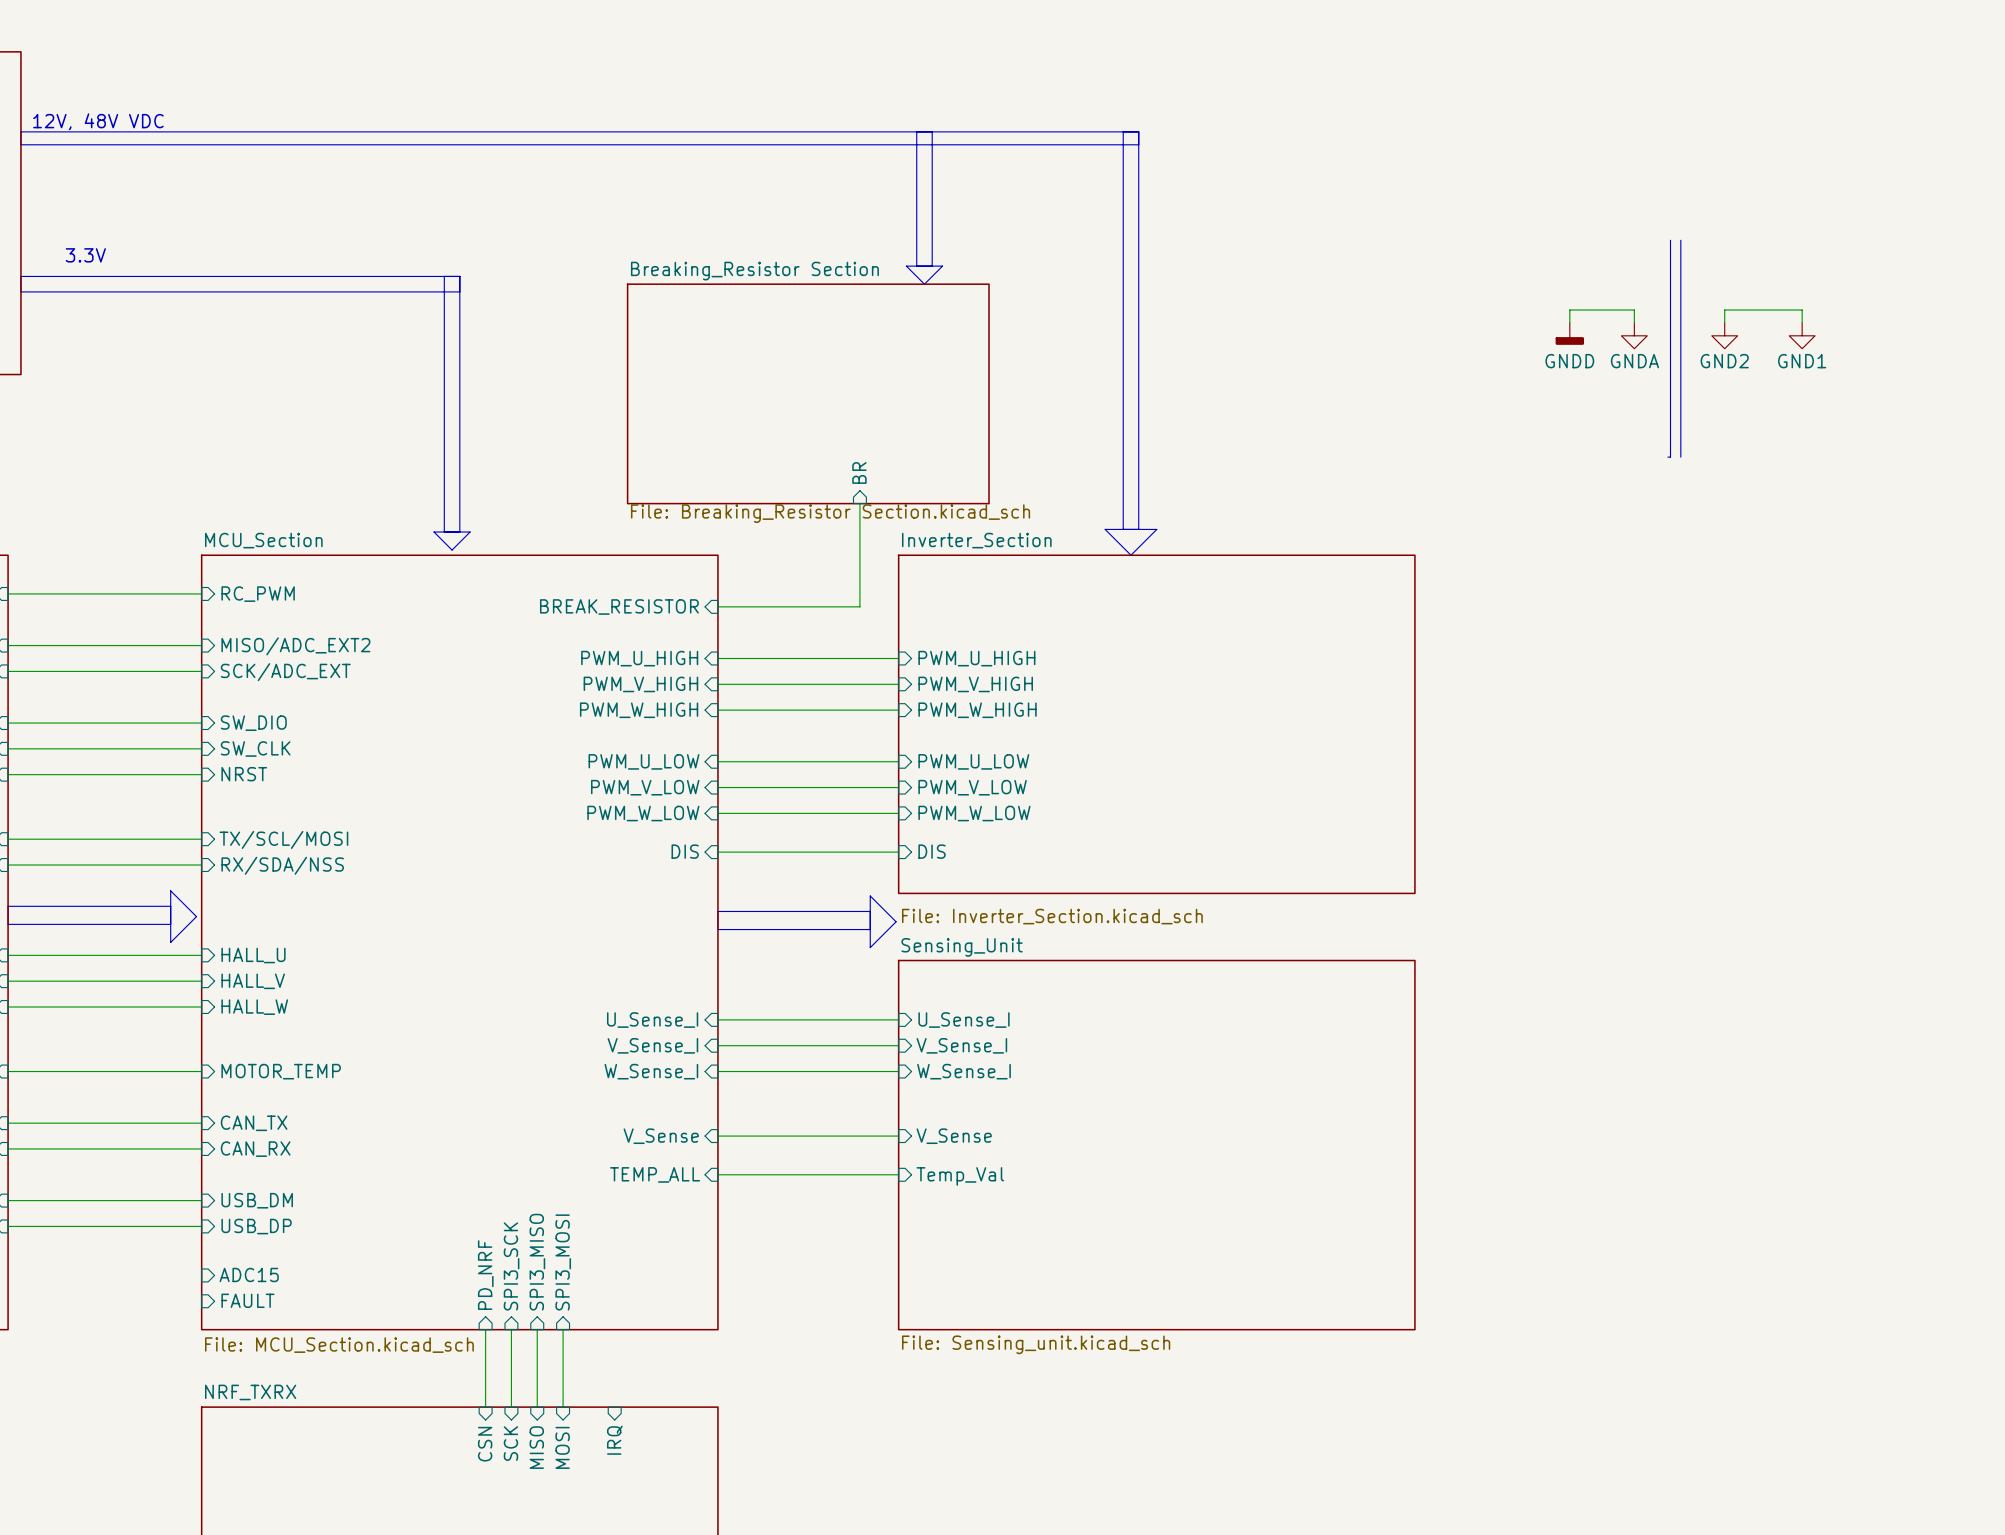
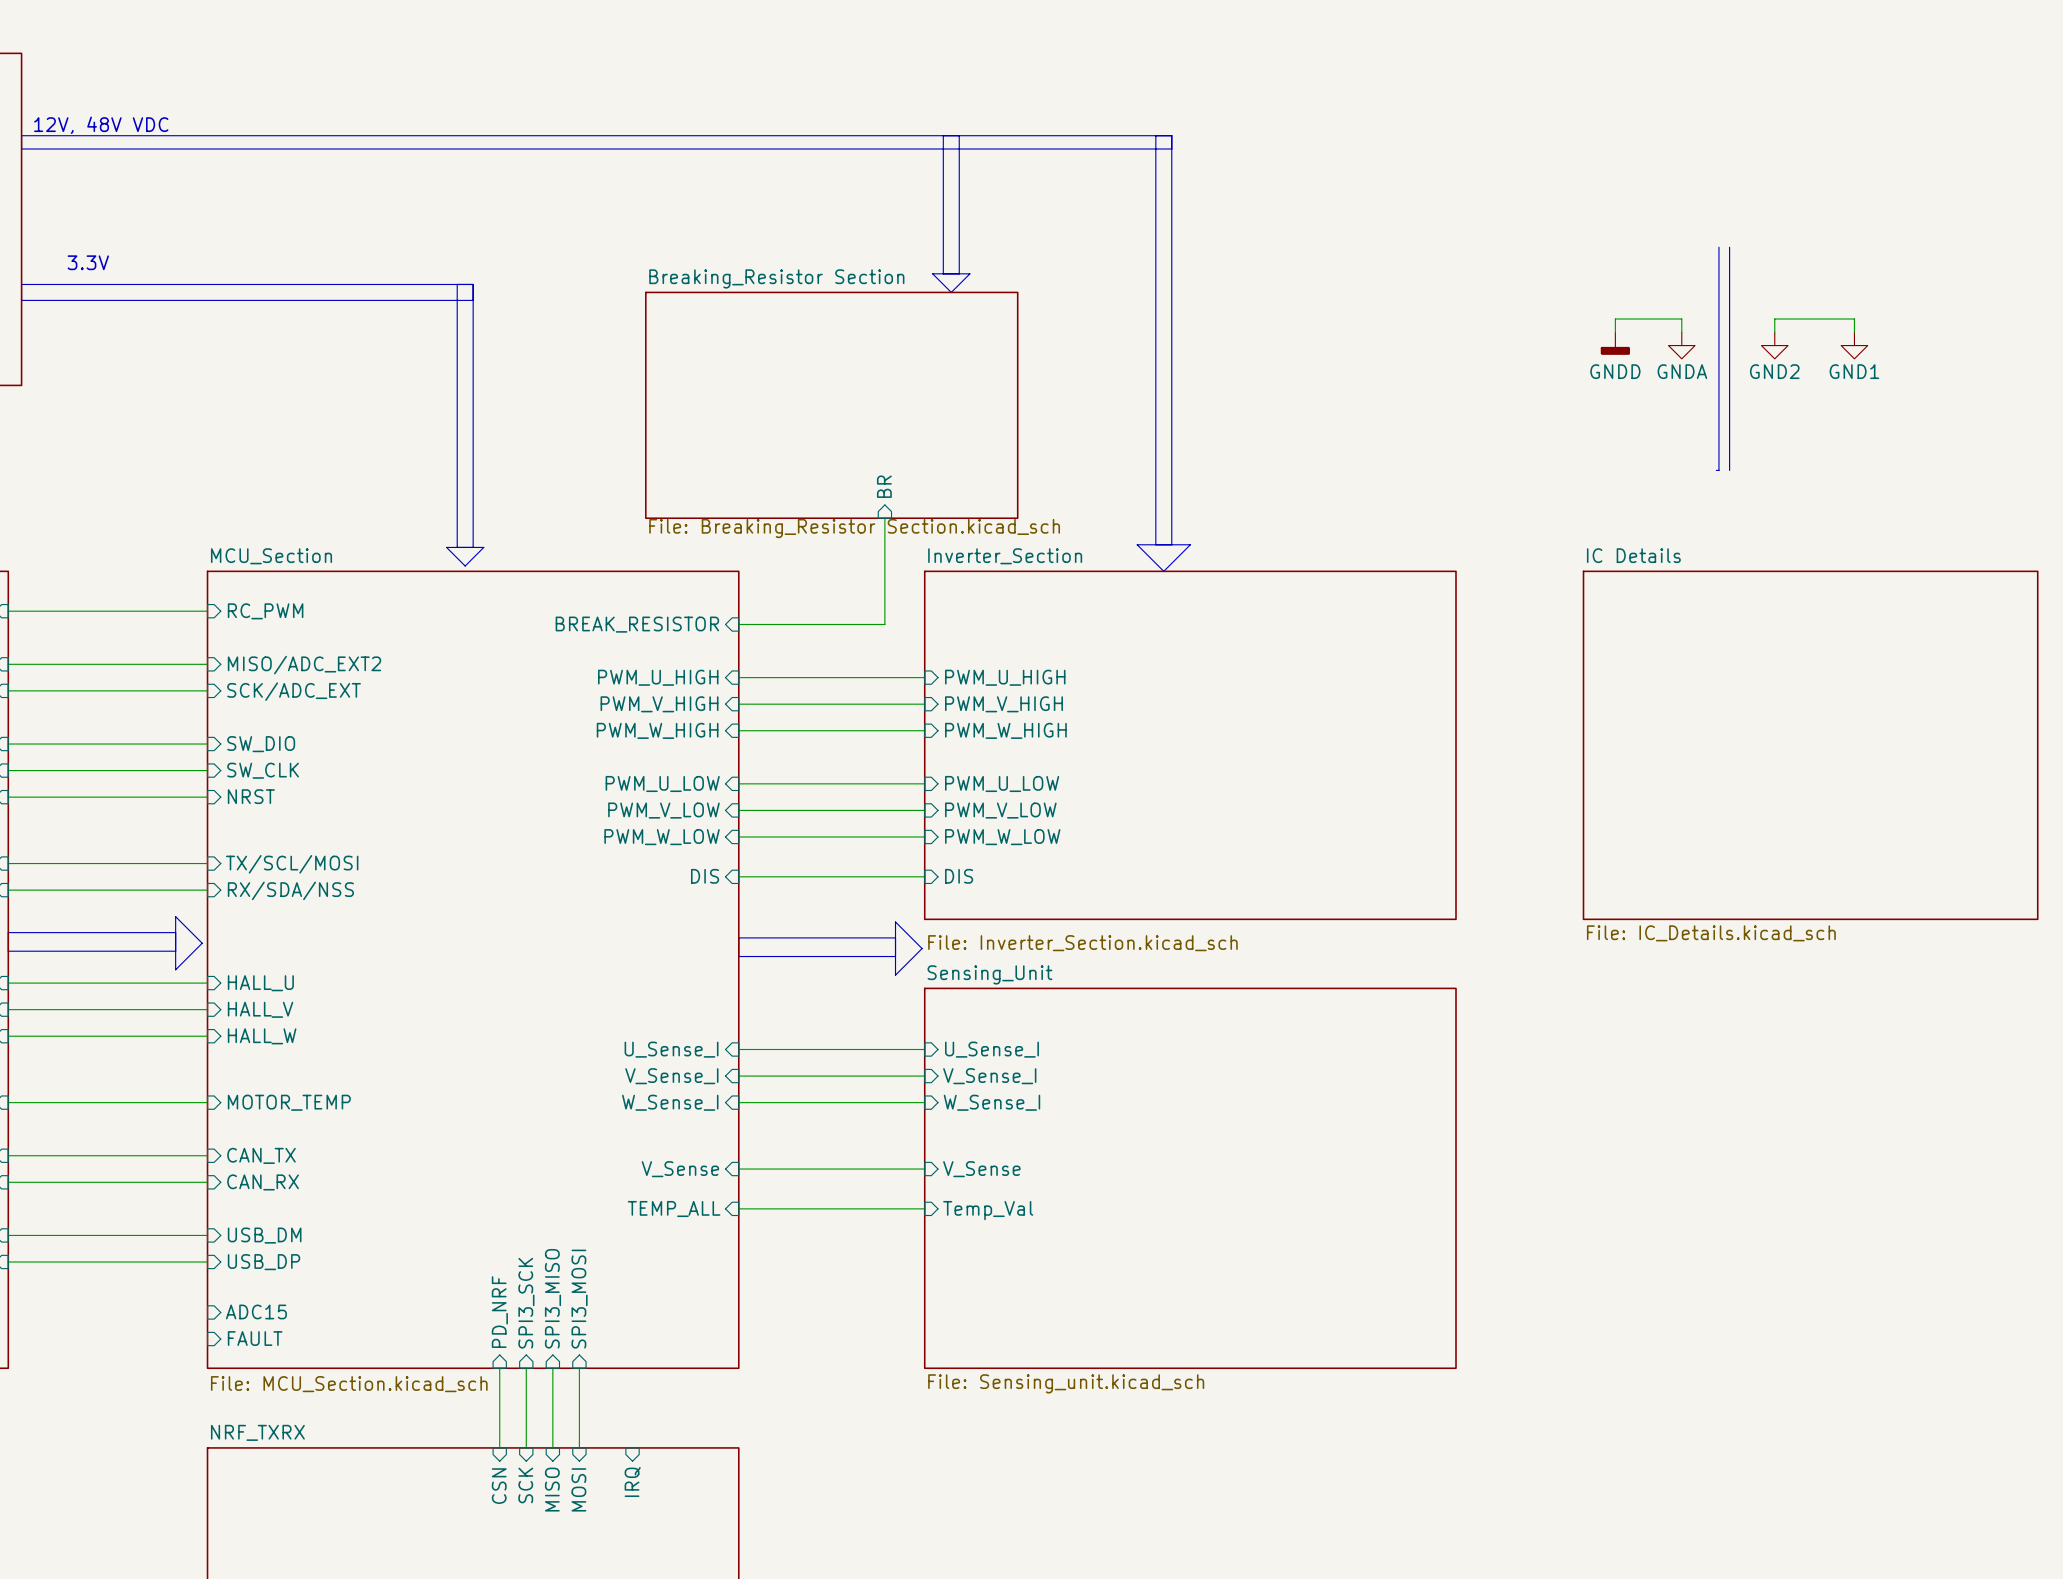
sheet IC Details: none -> File: IC_Details.kicad_sch (1810, 745)

